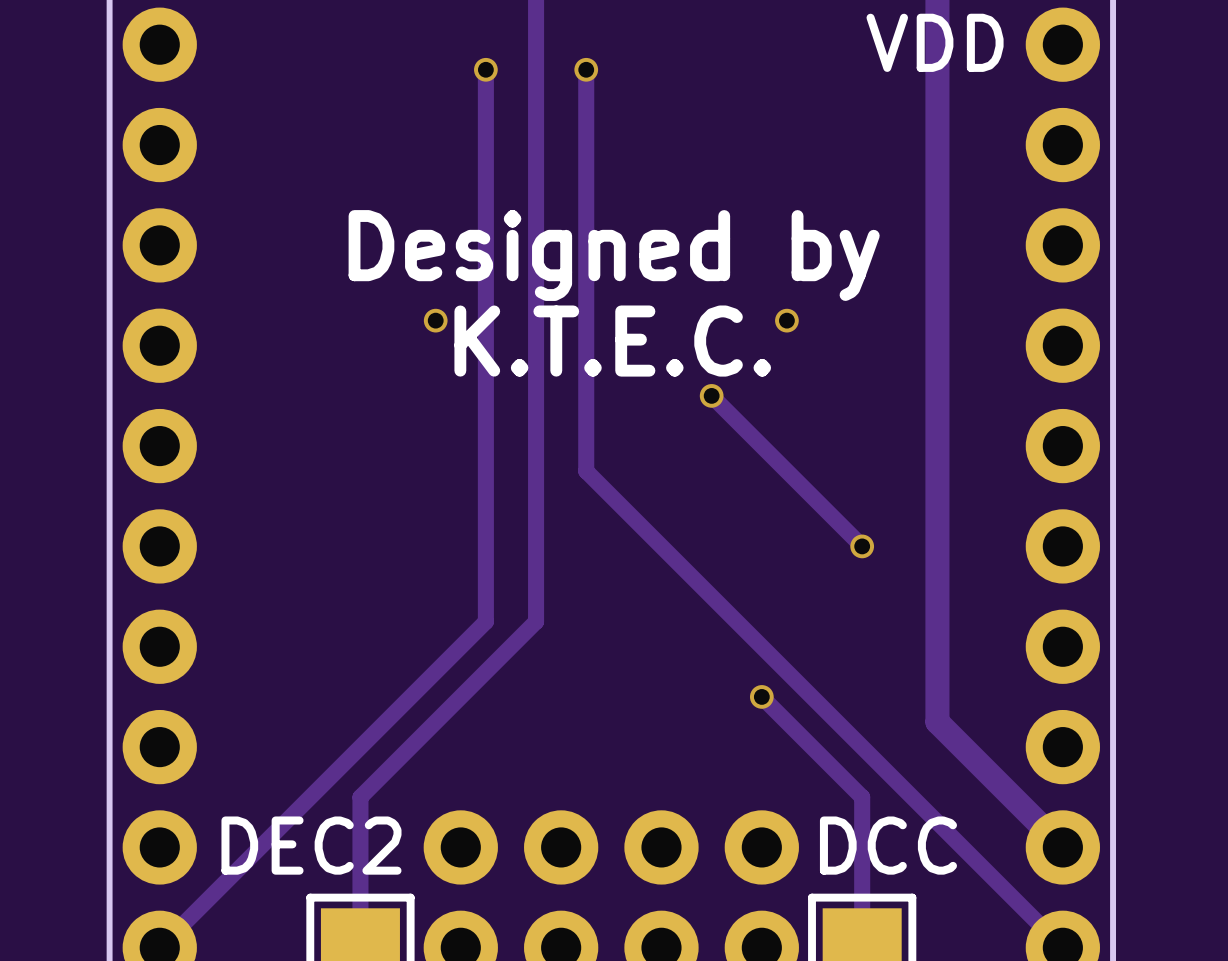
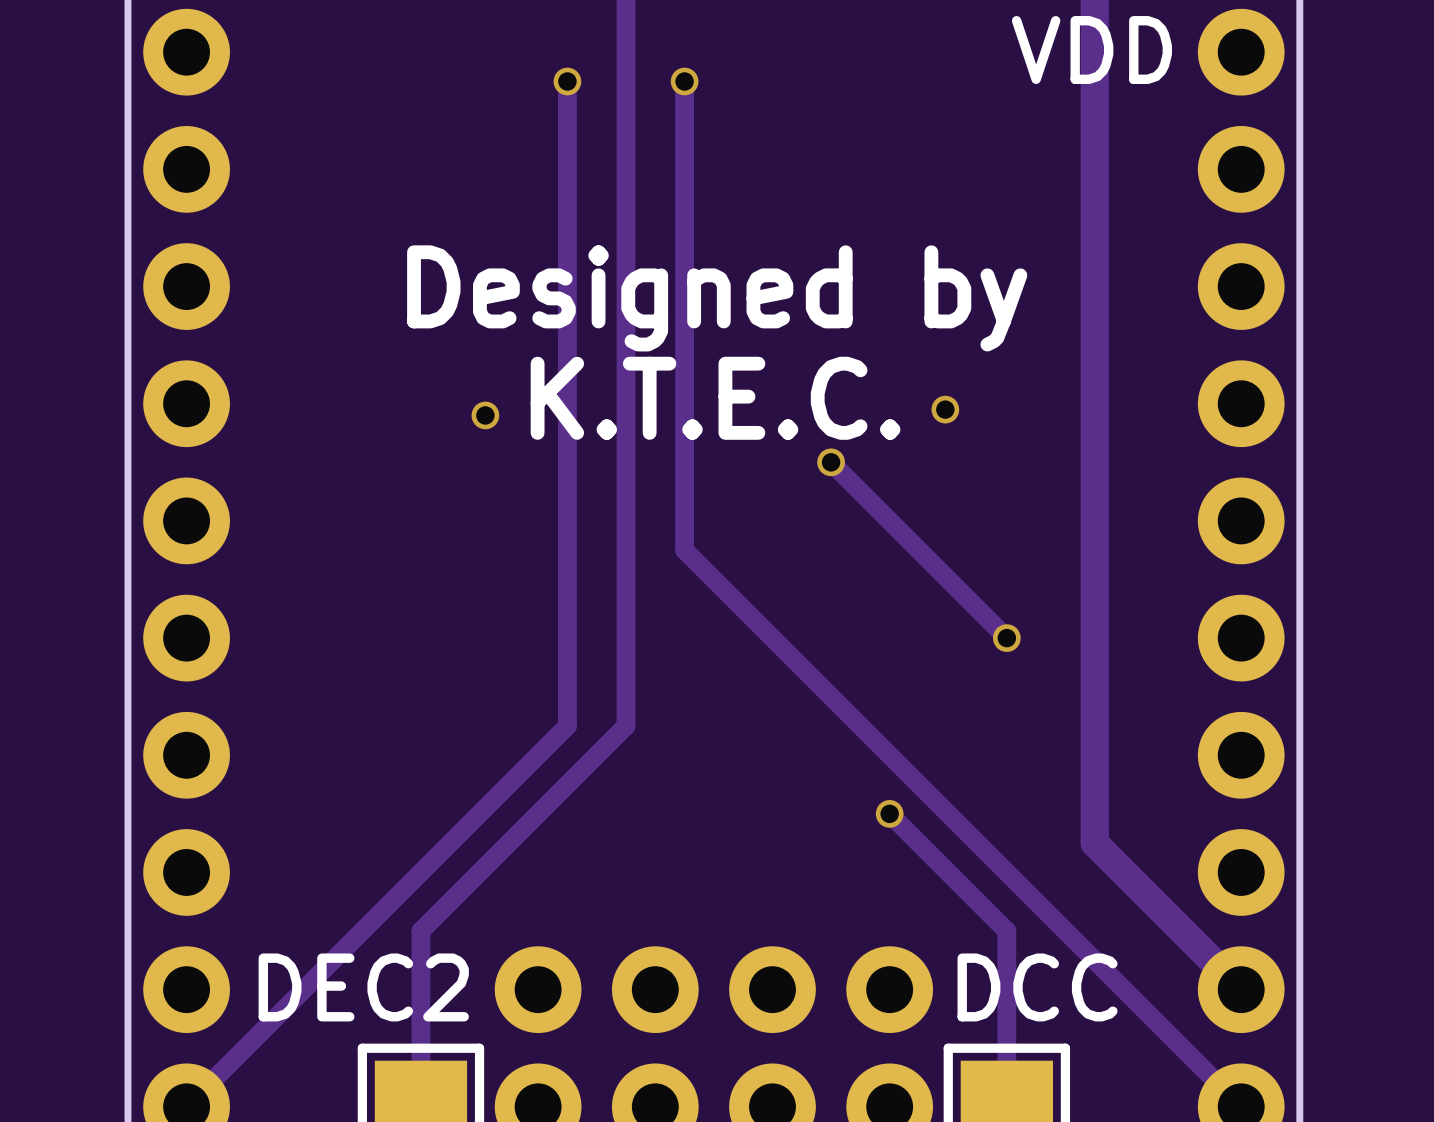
via position: (435, 320) -> (485, 415)
via position: (786, 320) -> (945, 409)

